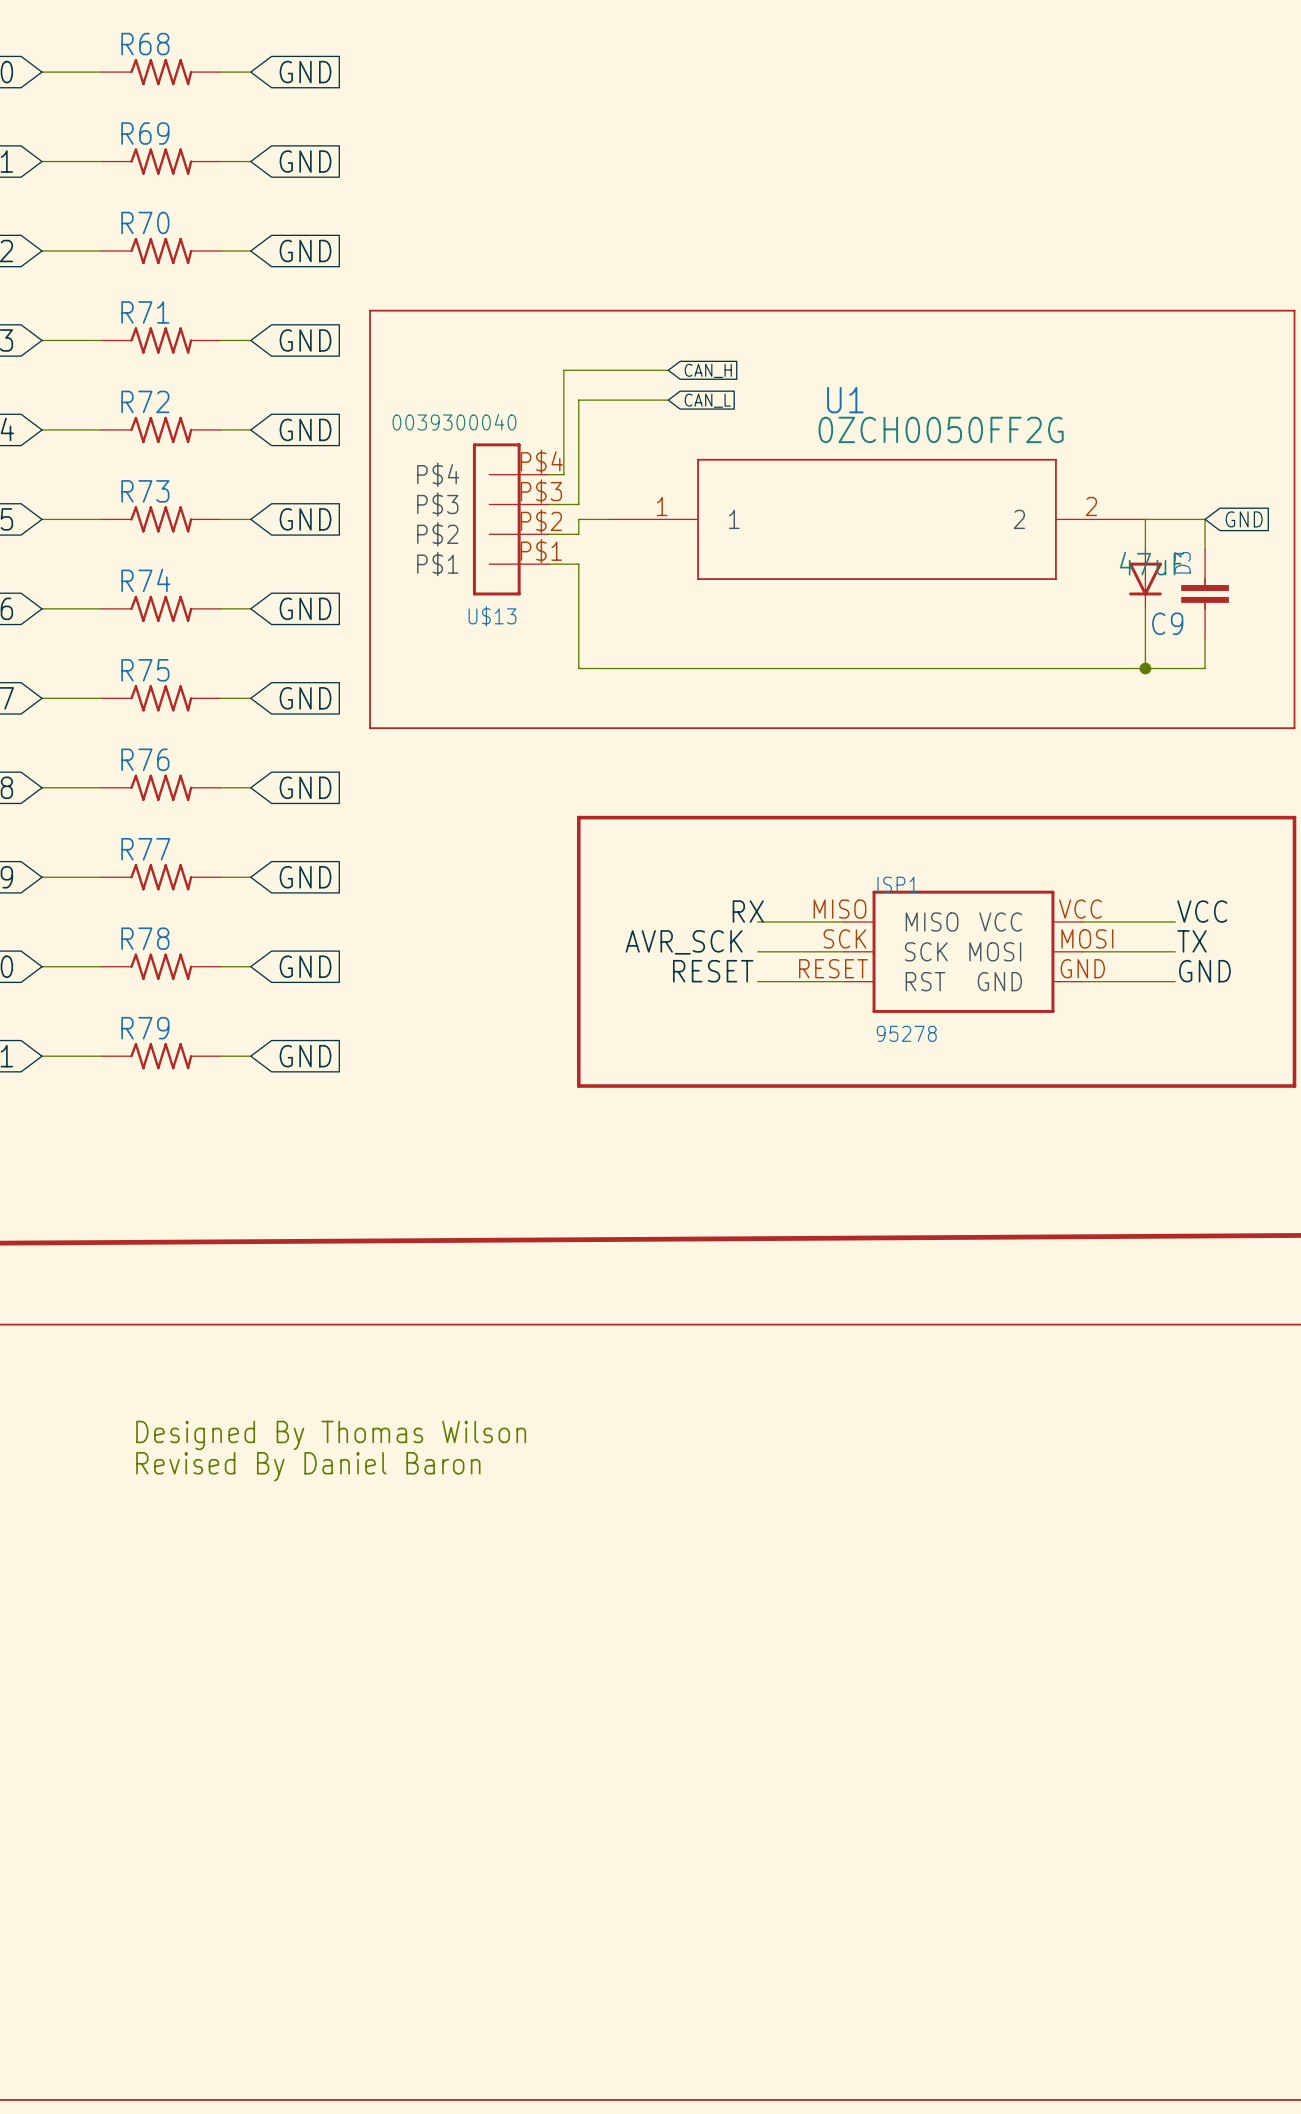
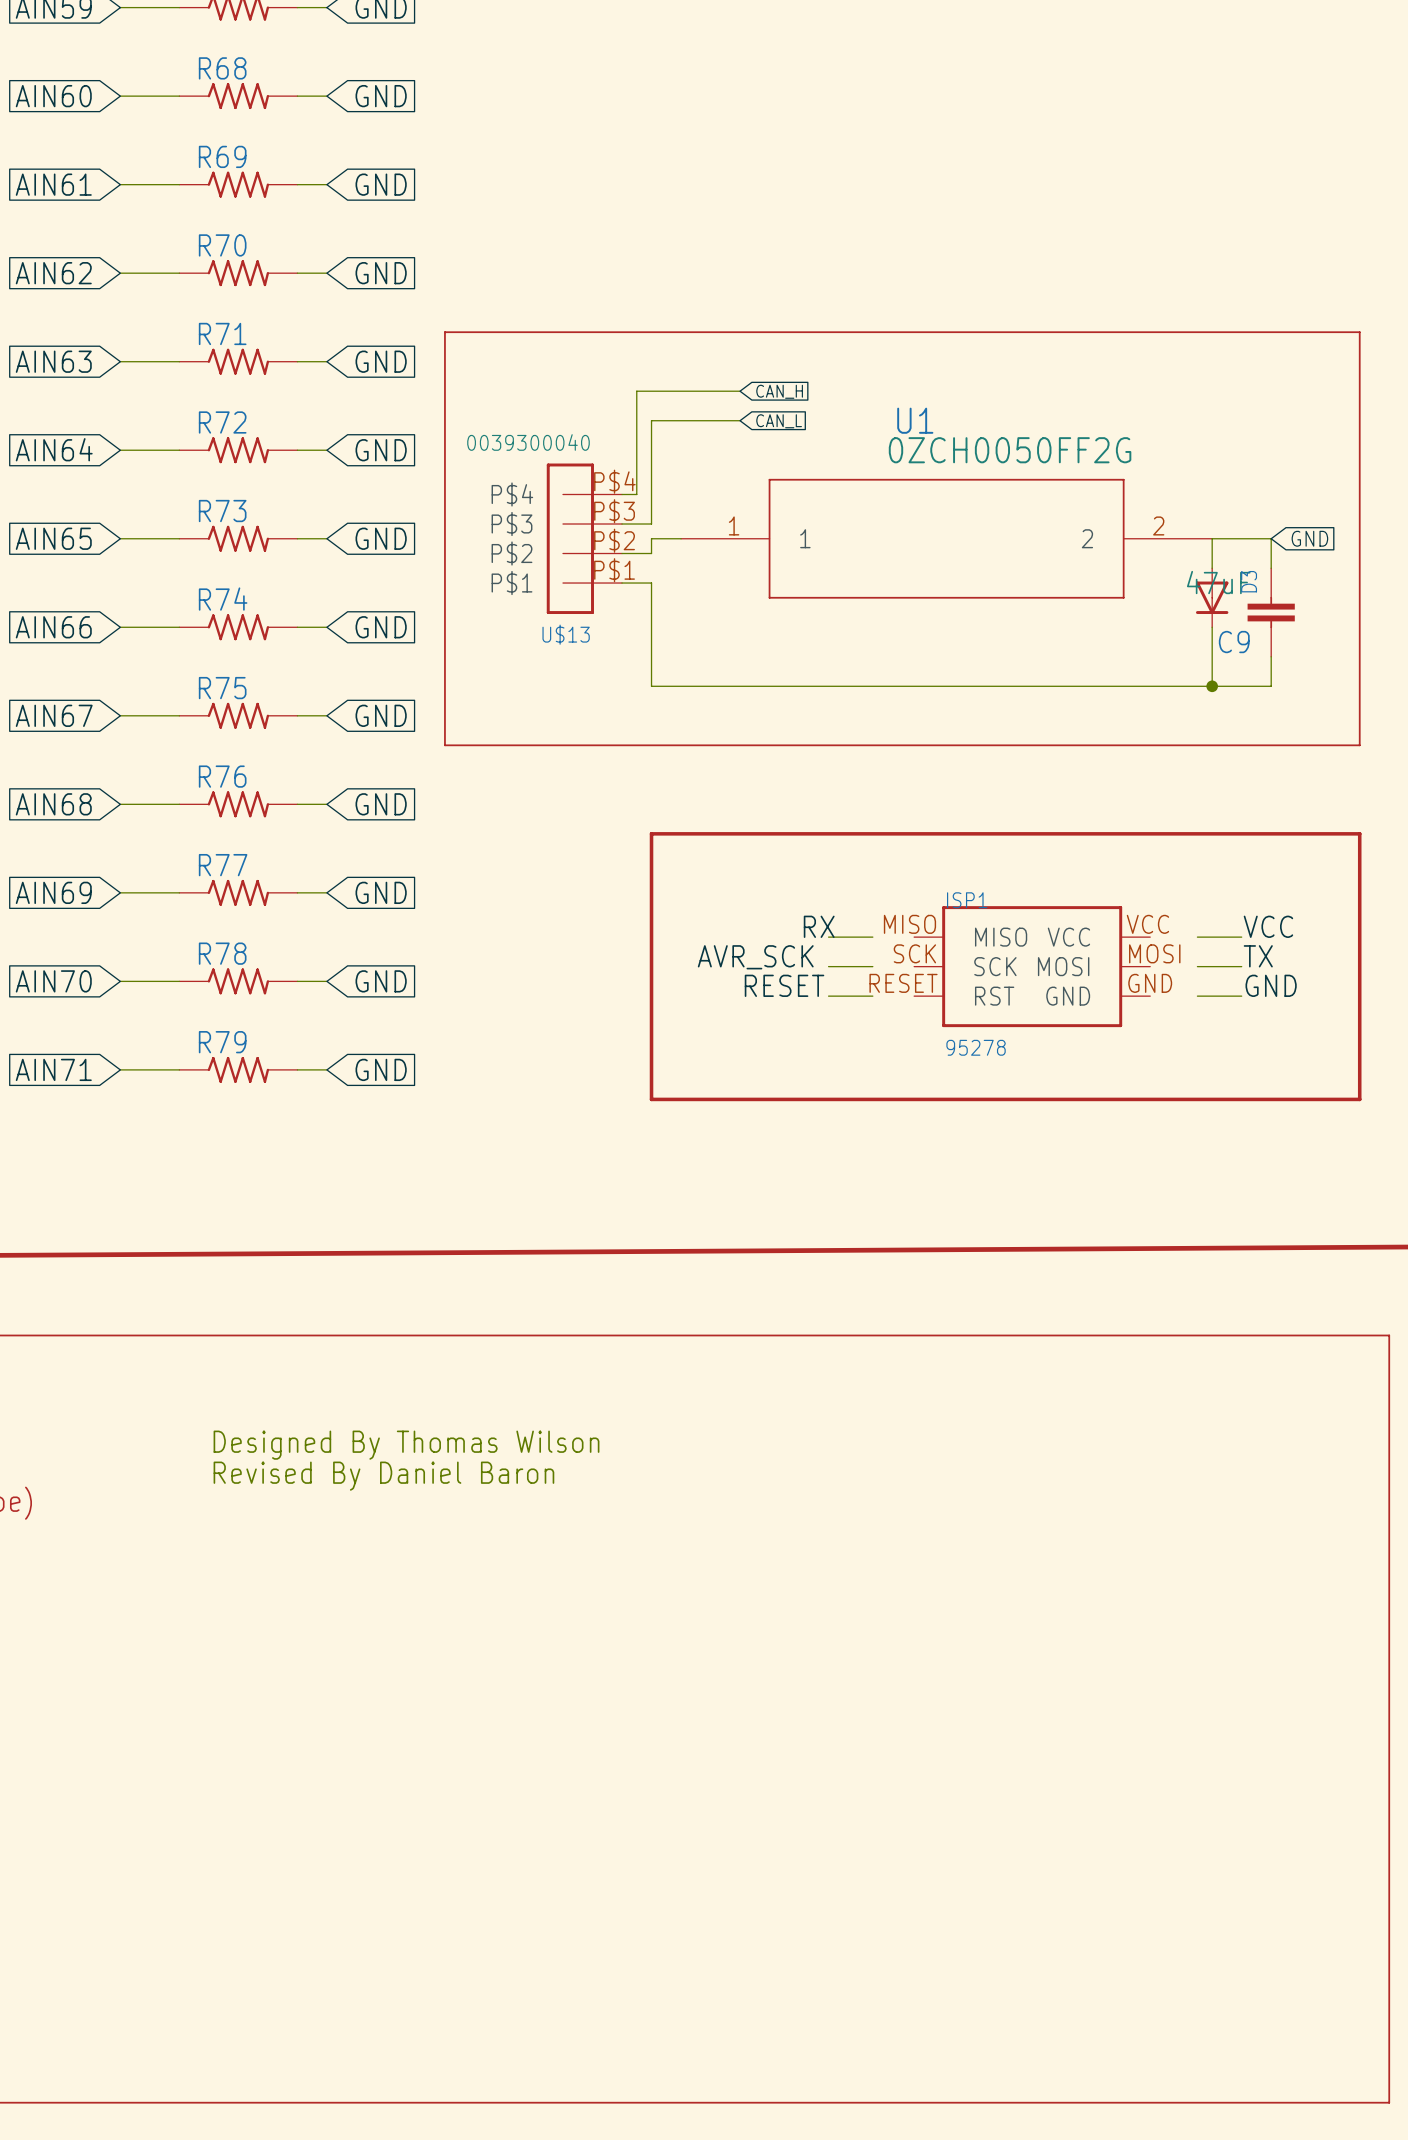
wire: (802, 922) (844, 922) -> none
wire: (1082, 922) (1130, 922) -> none
wire: (802, 951) (844, 951) -> none
wire: (1082, 951) (1130, 951) -> none
wire: (802, 981) (844, 981) -> none
wire: (1082, 981) (1130, 981) -> none

